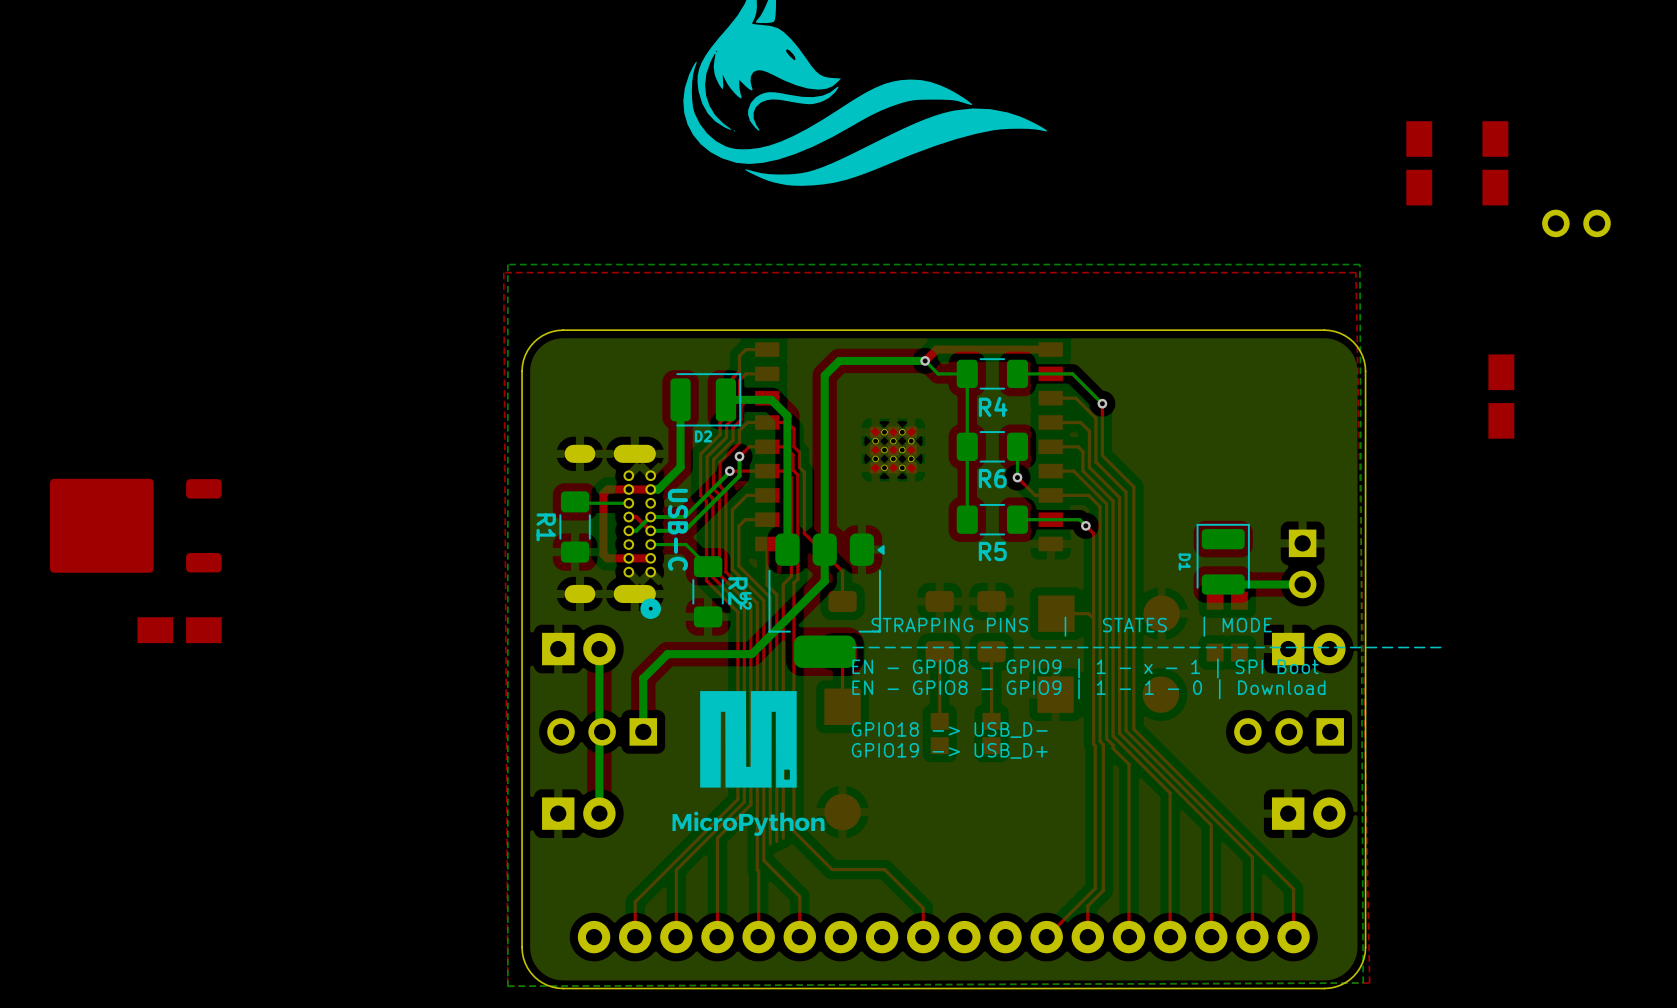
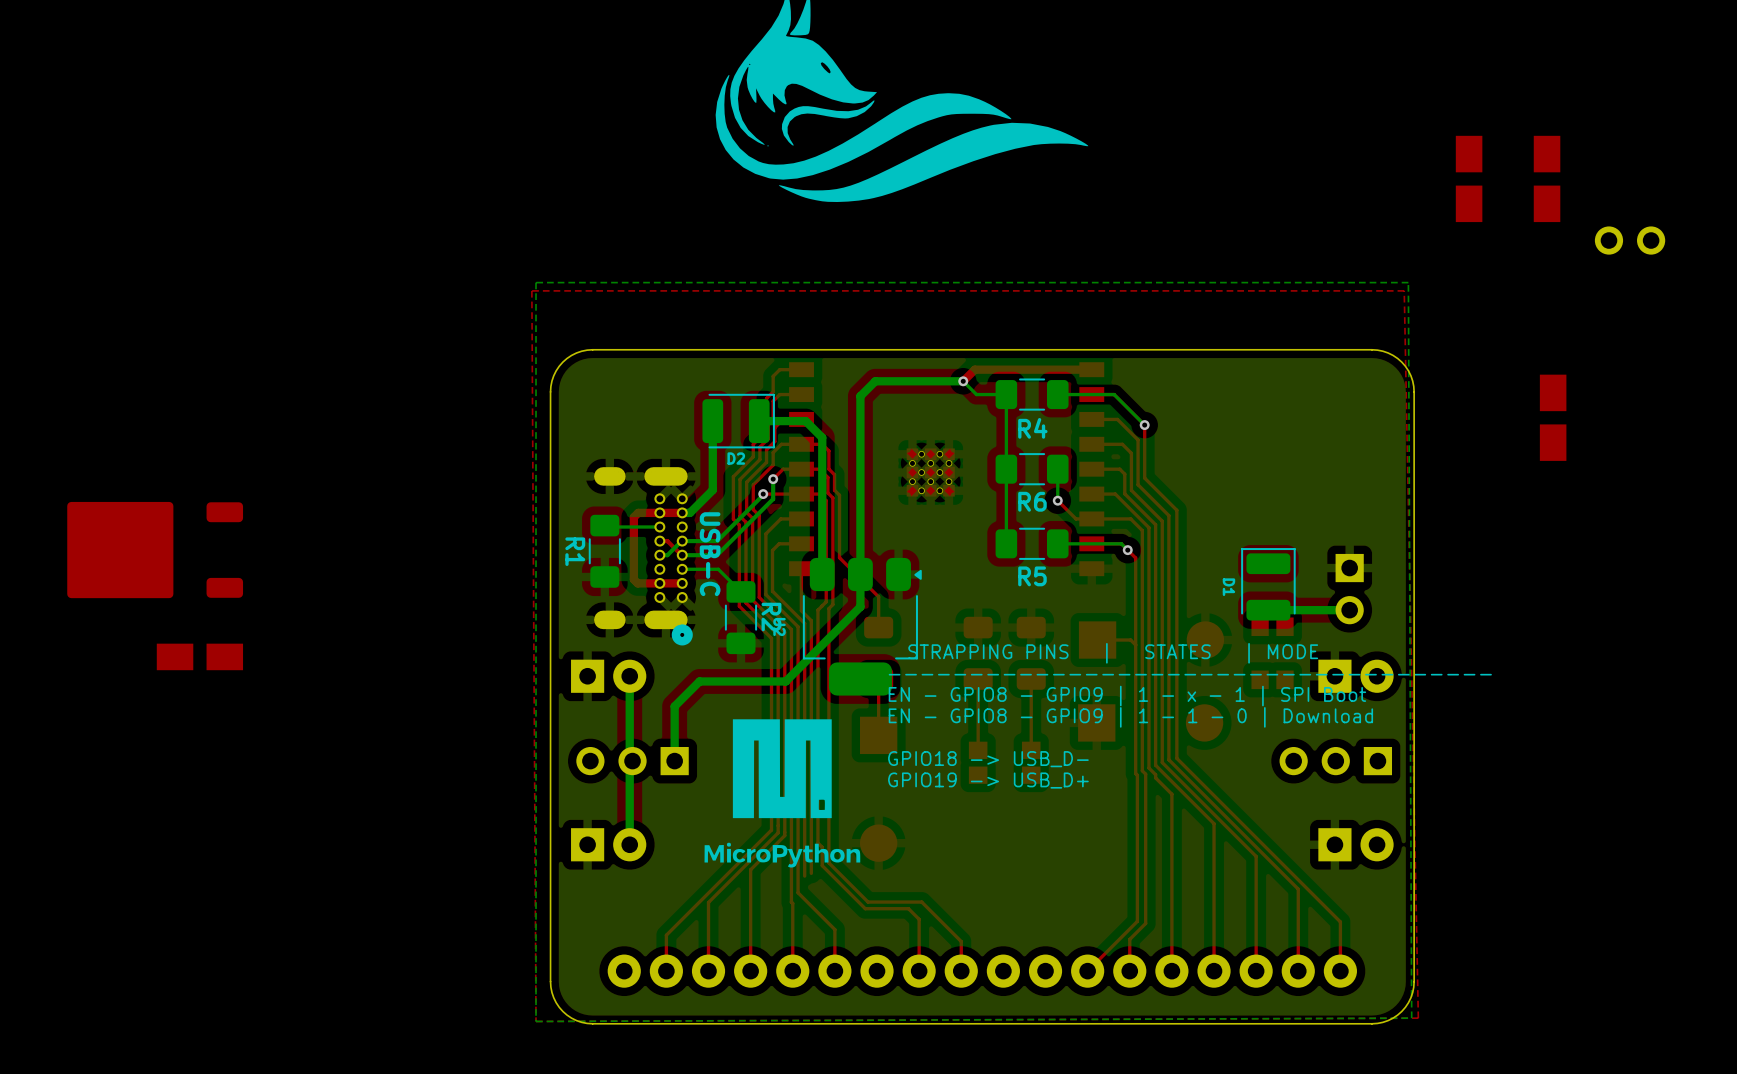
top track: (783, 811) (783, 838) -> (817, 843) (822, 847) (822, 865) (865, 908) (908, 908) (919, 919) (919, 971)

